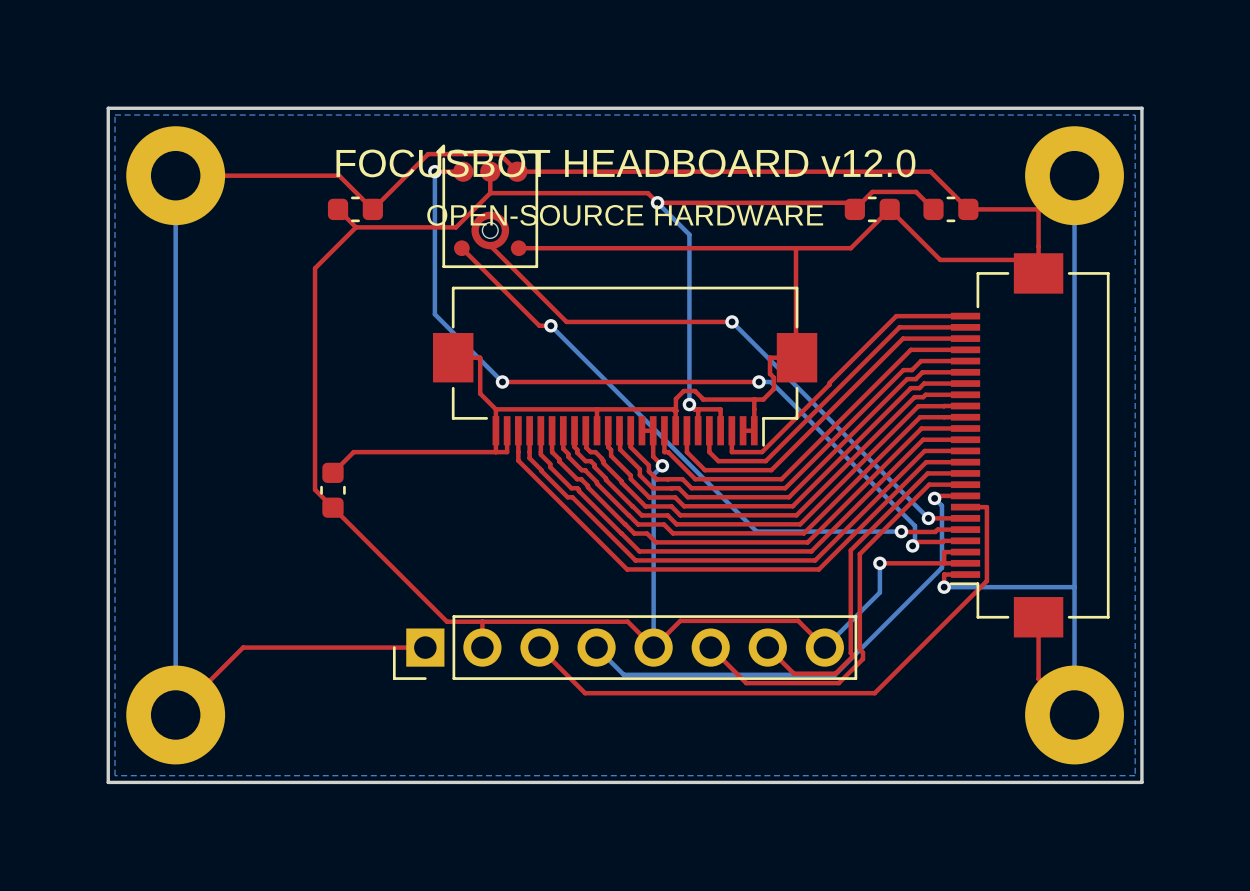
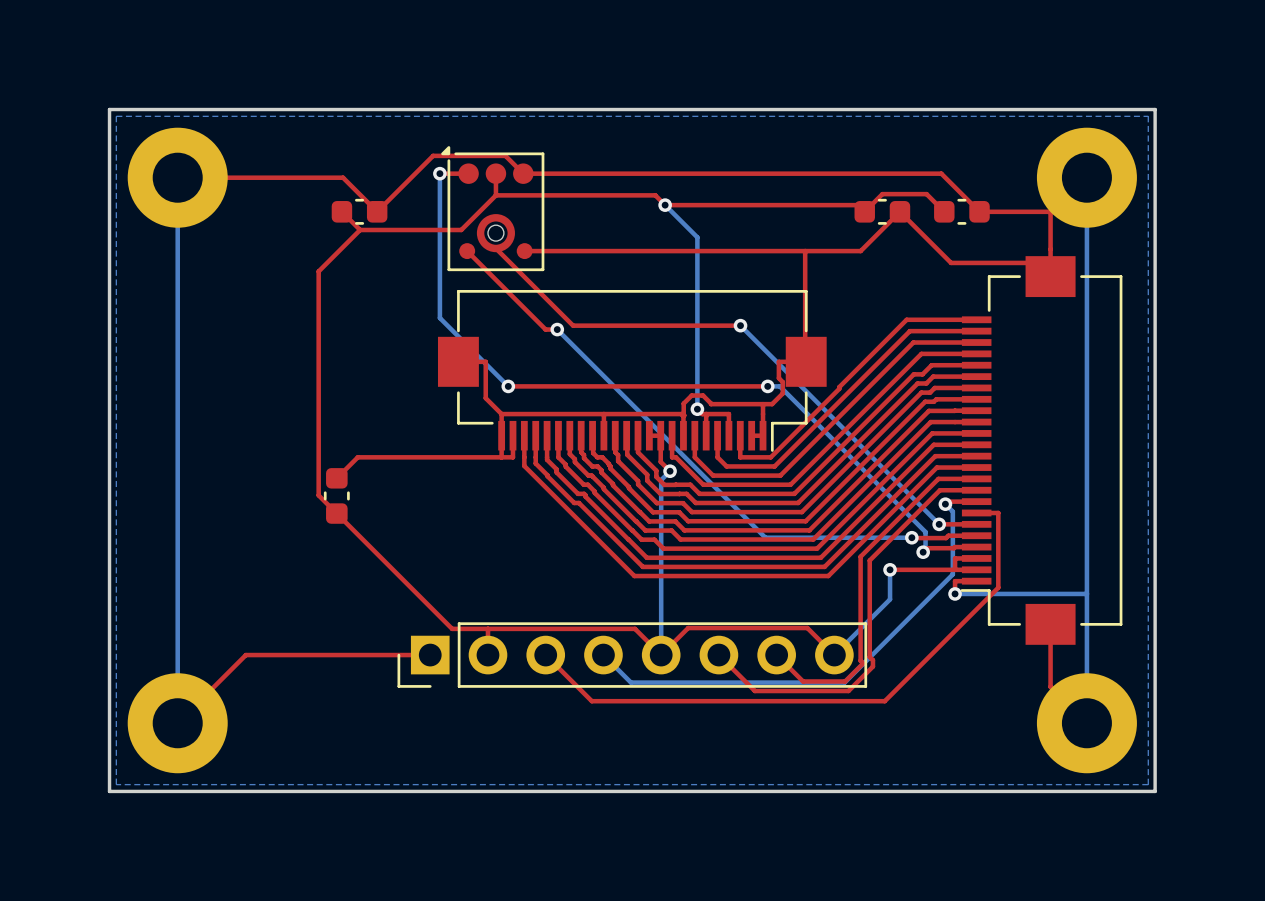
text: FOCUSBOT HEADBOARD v12.0 (625, 163) -> none
text: OPEN-SOURCE HARDWARE (625, 215) -> none

